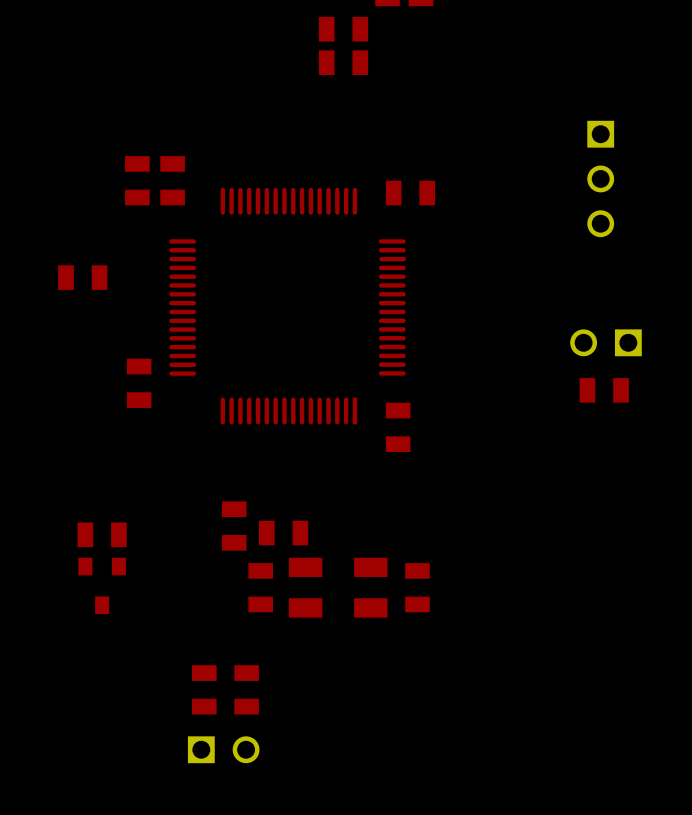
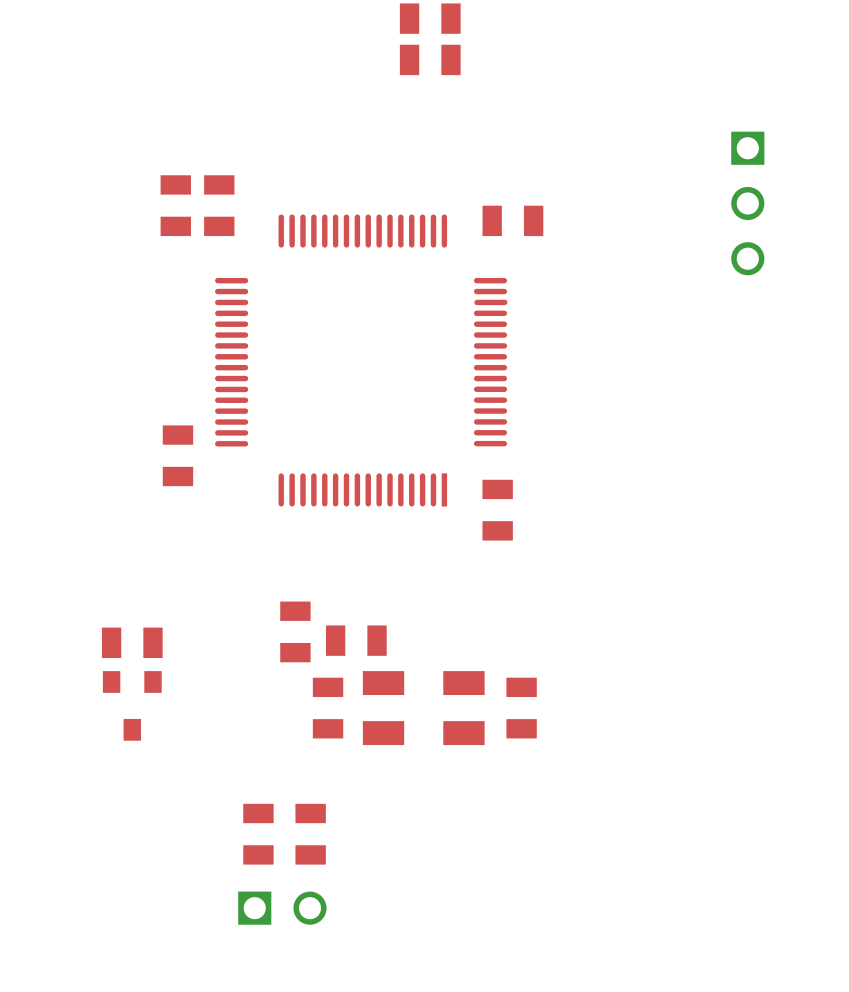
part: (82, 277) -> none
part: (605, 342) -> none
part: (604, 390) -> none

